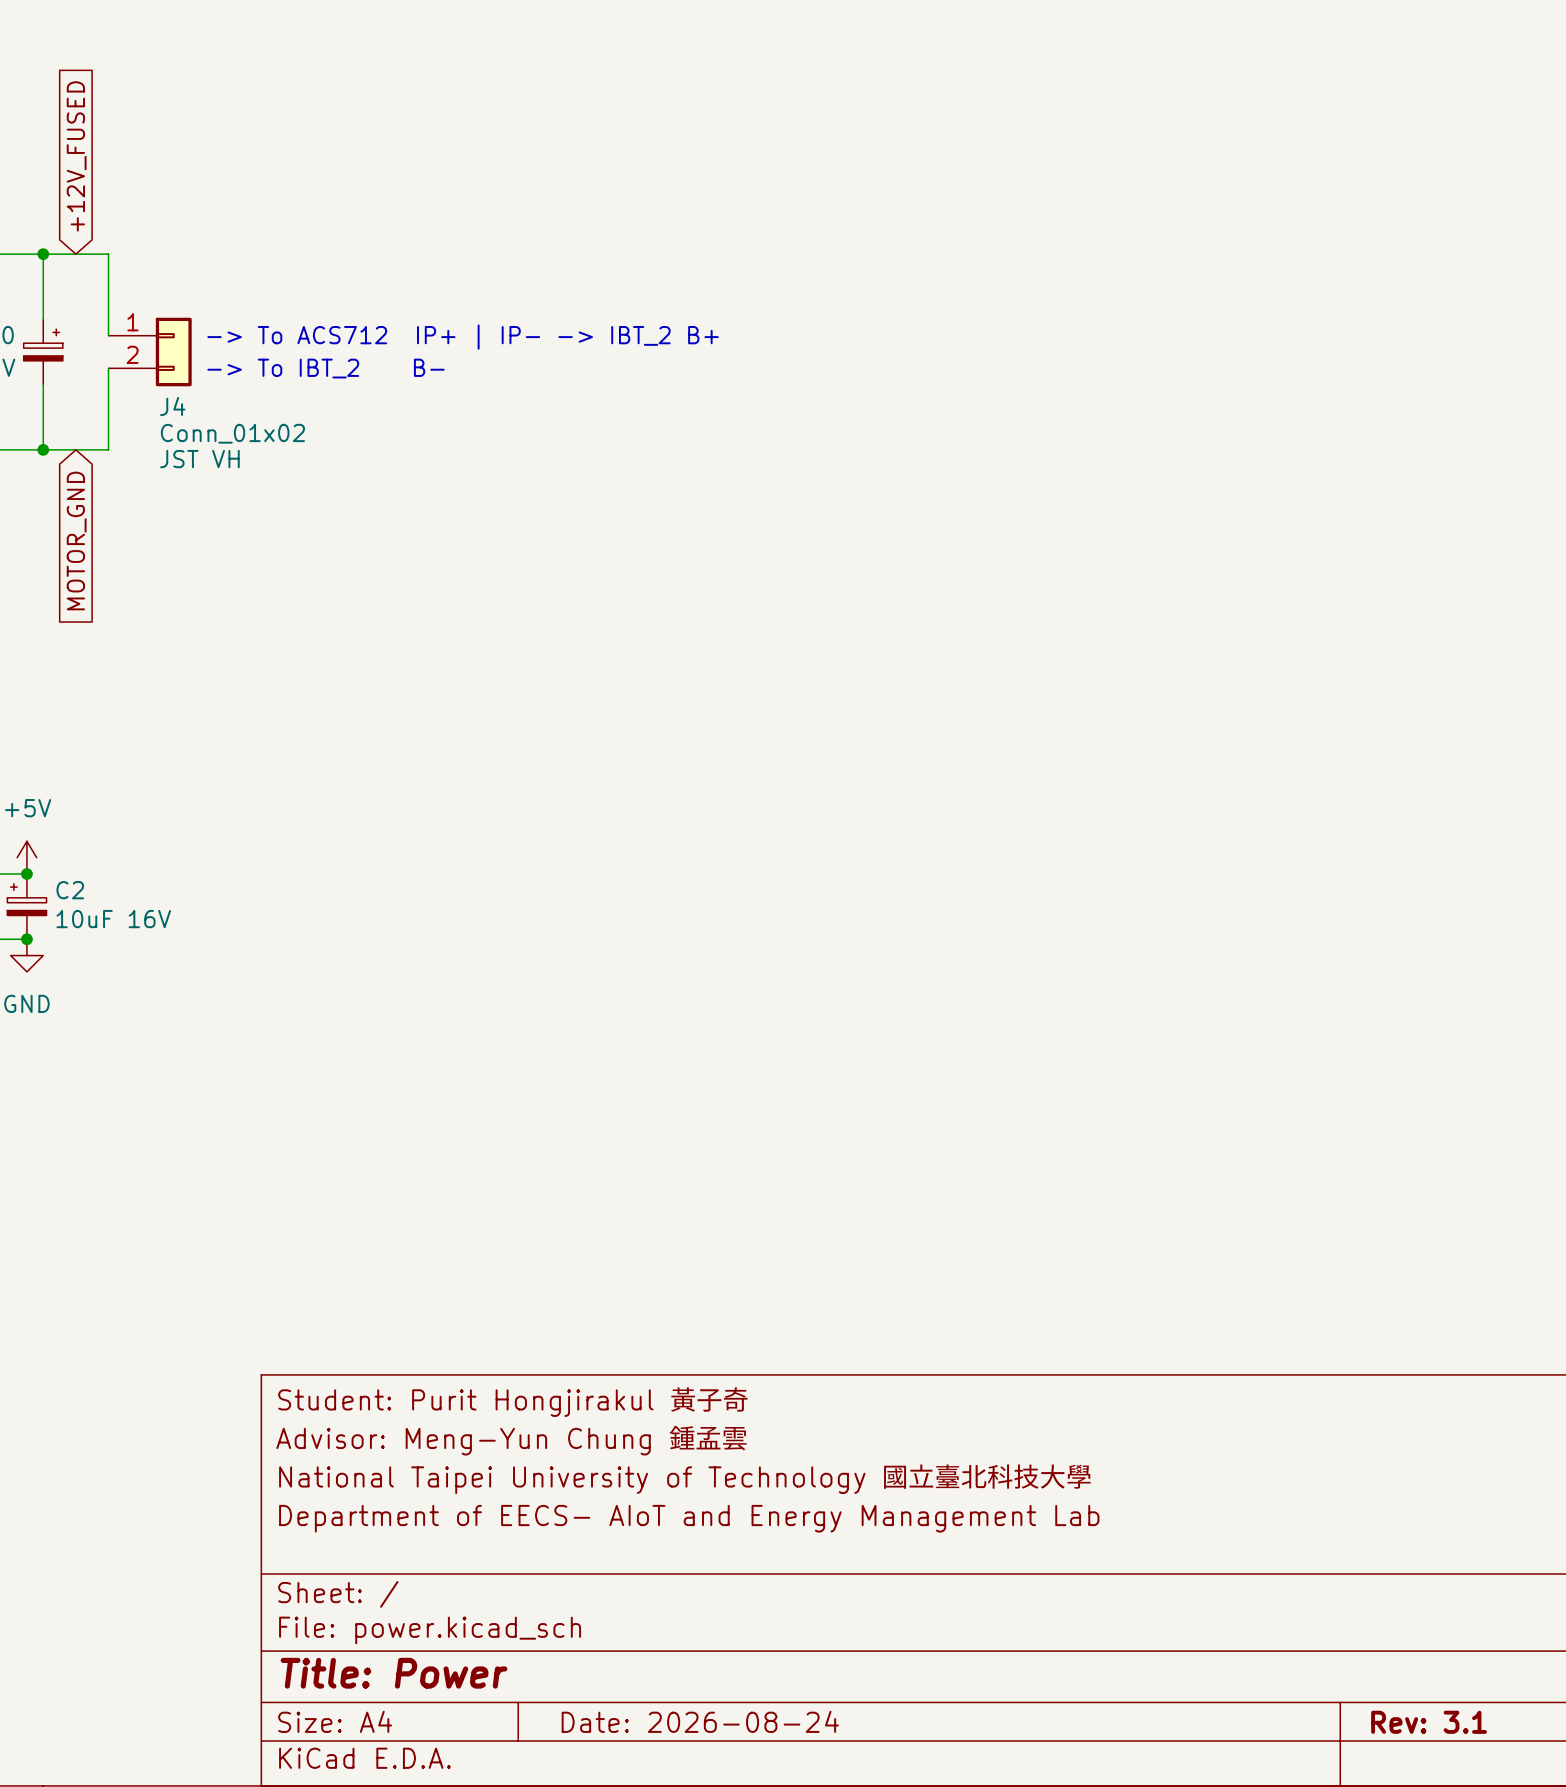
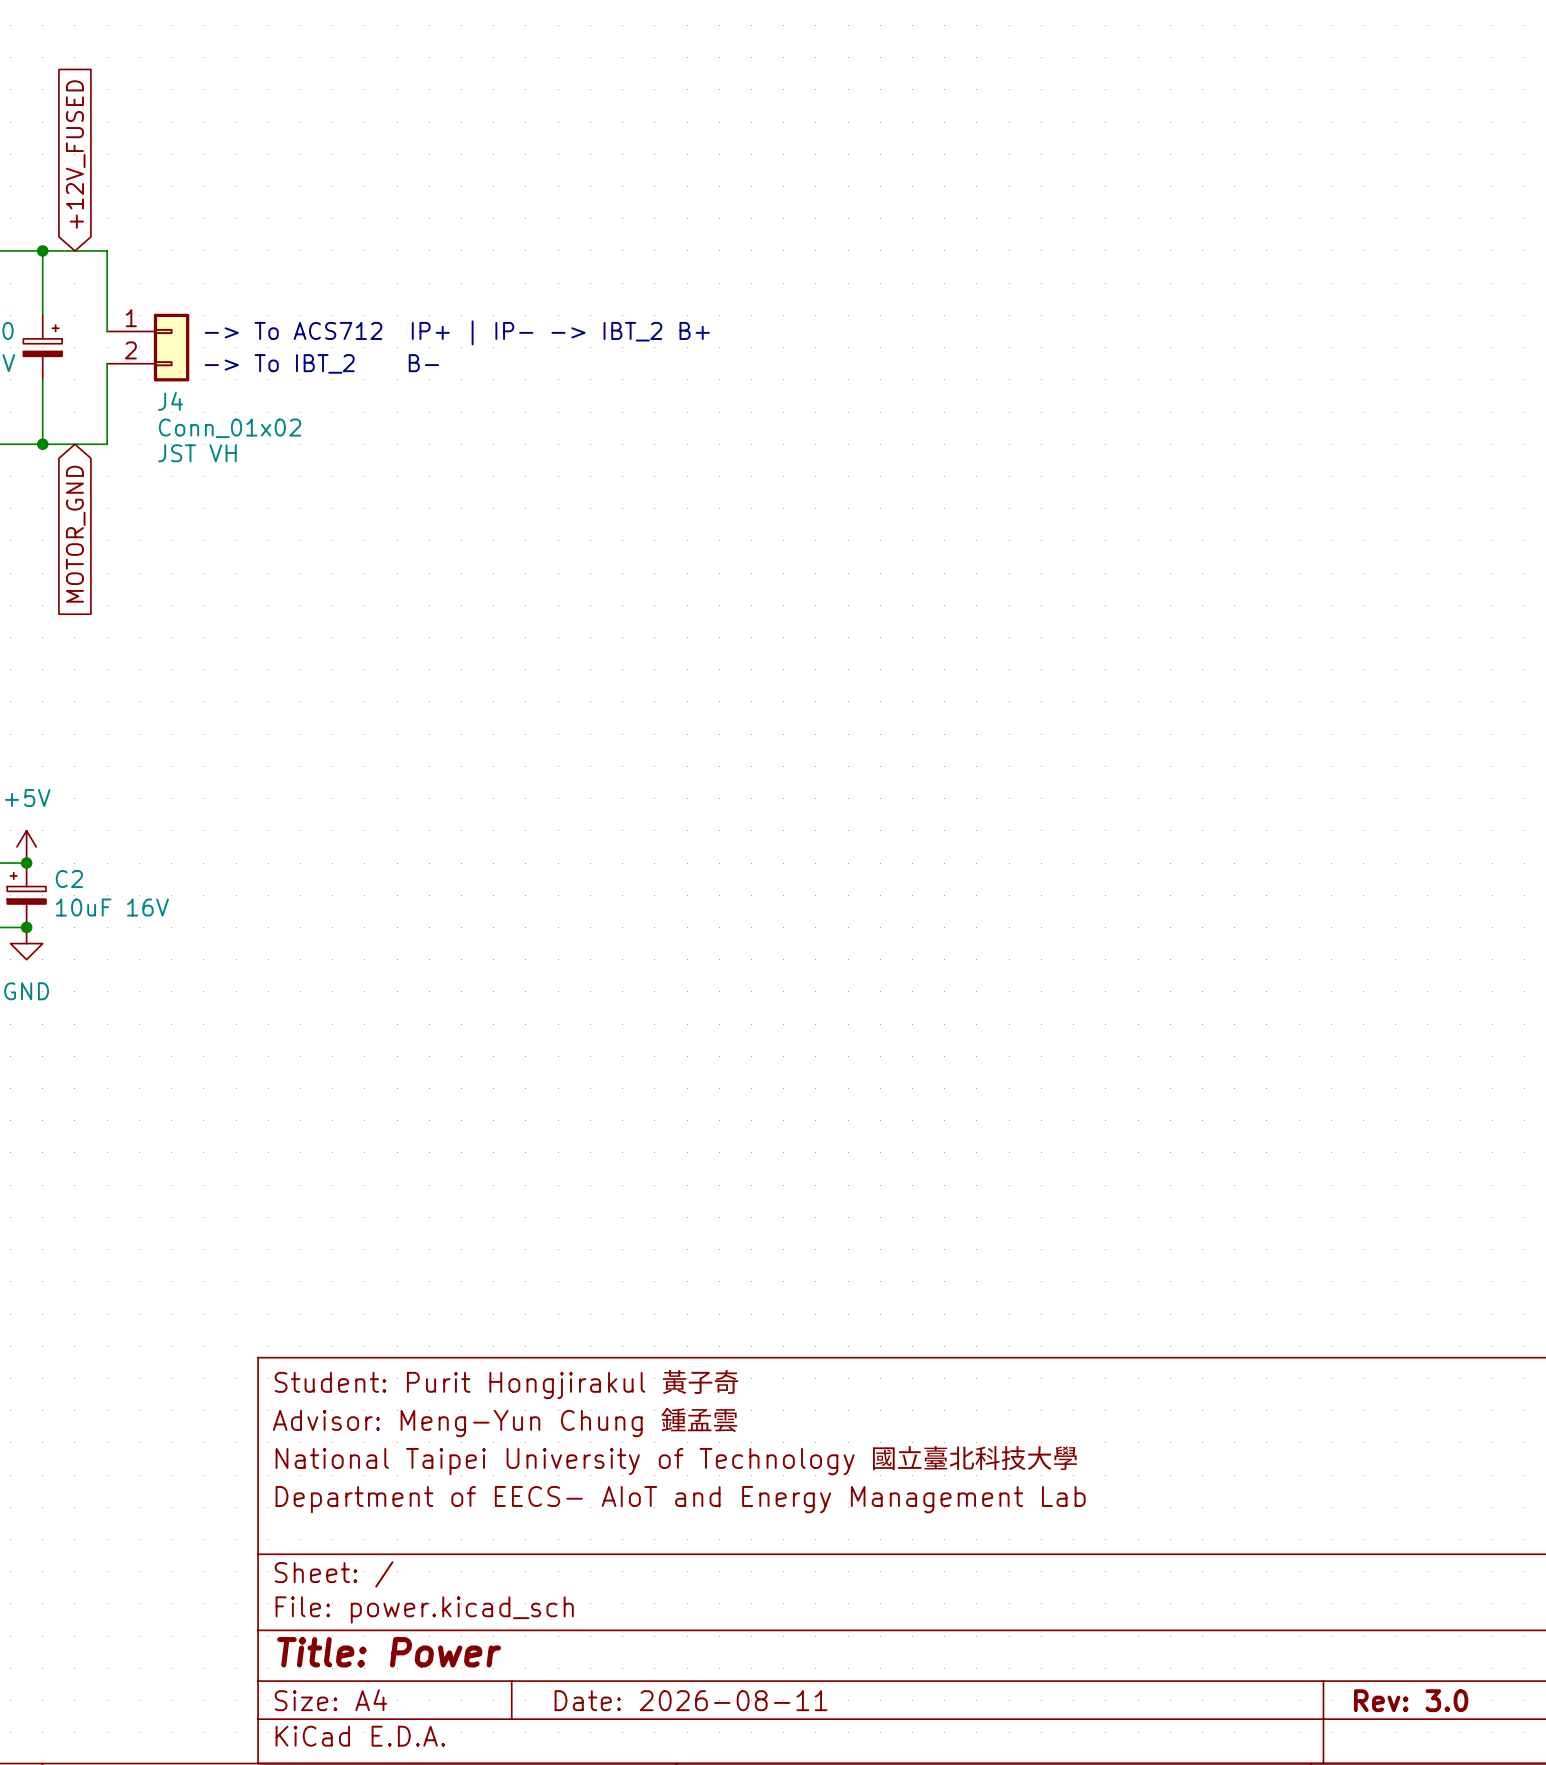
title block: Date: 2026-08-24 (700, 1721) -> Date: 2026-08-11 (691, 1700)
title block: Rev: 3.1 (1429, 1722) -> Rev: 3.0 (1411, 1700)

